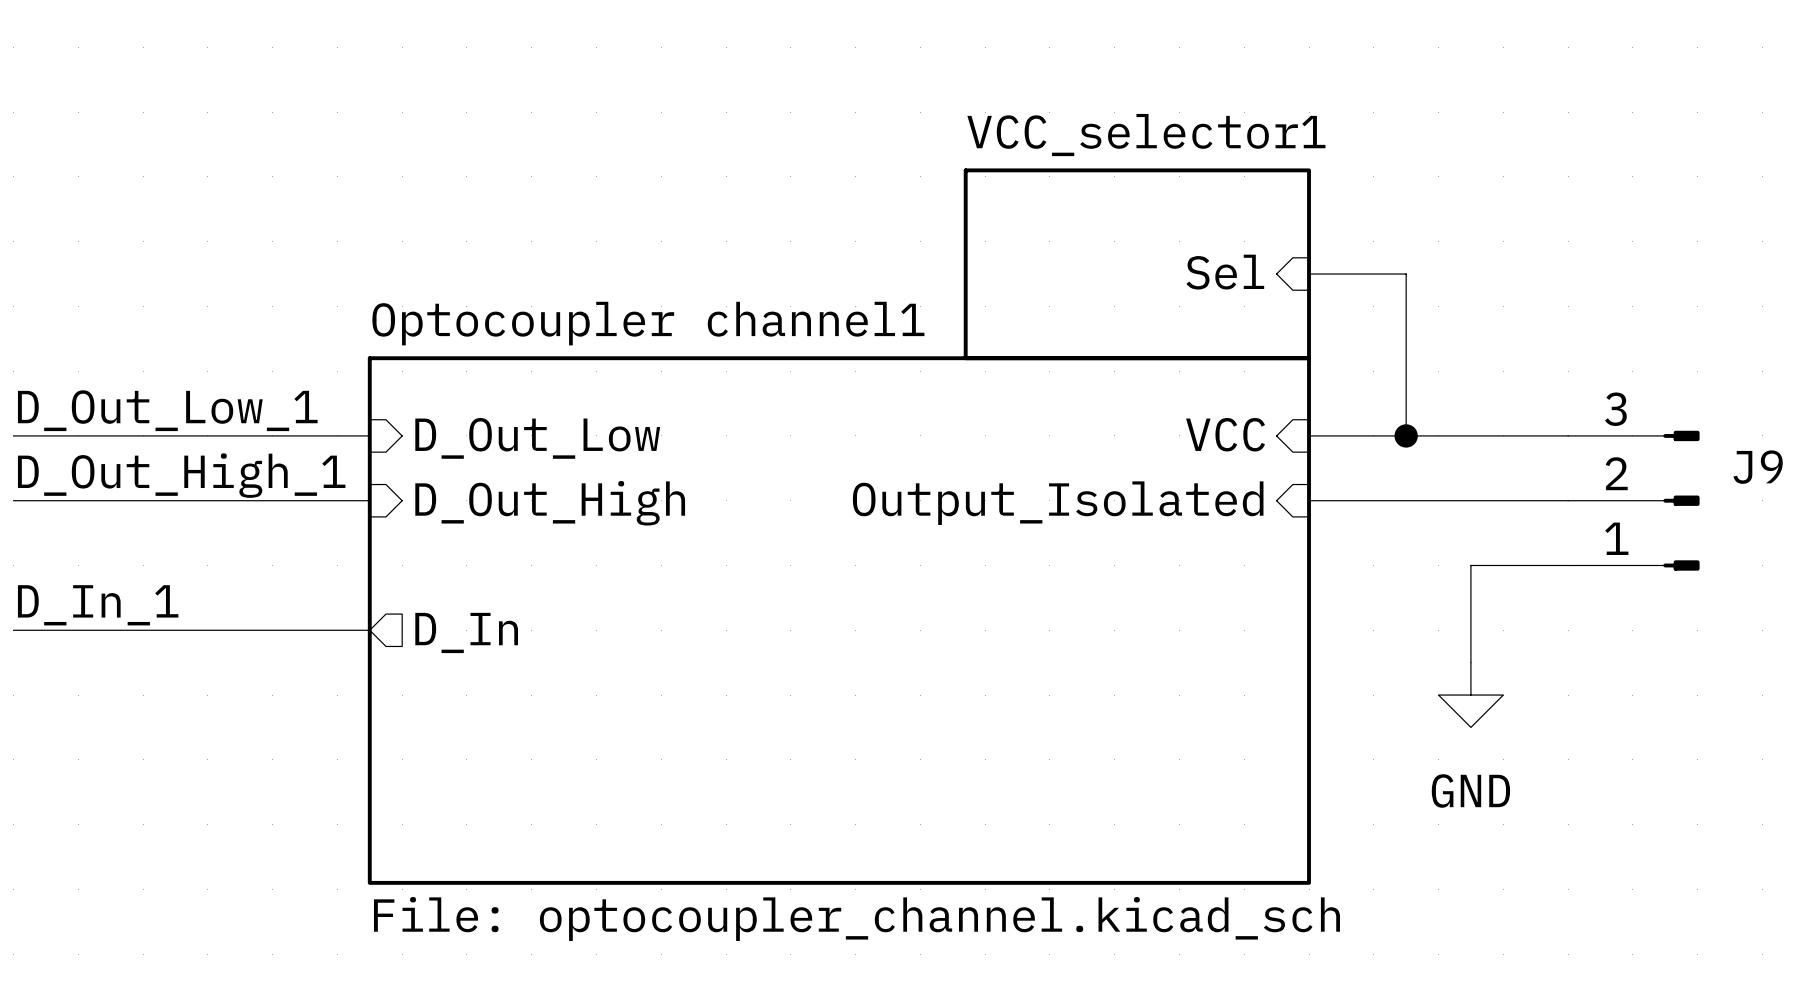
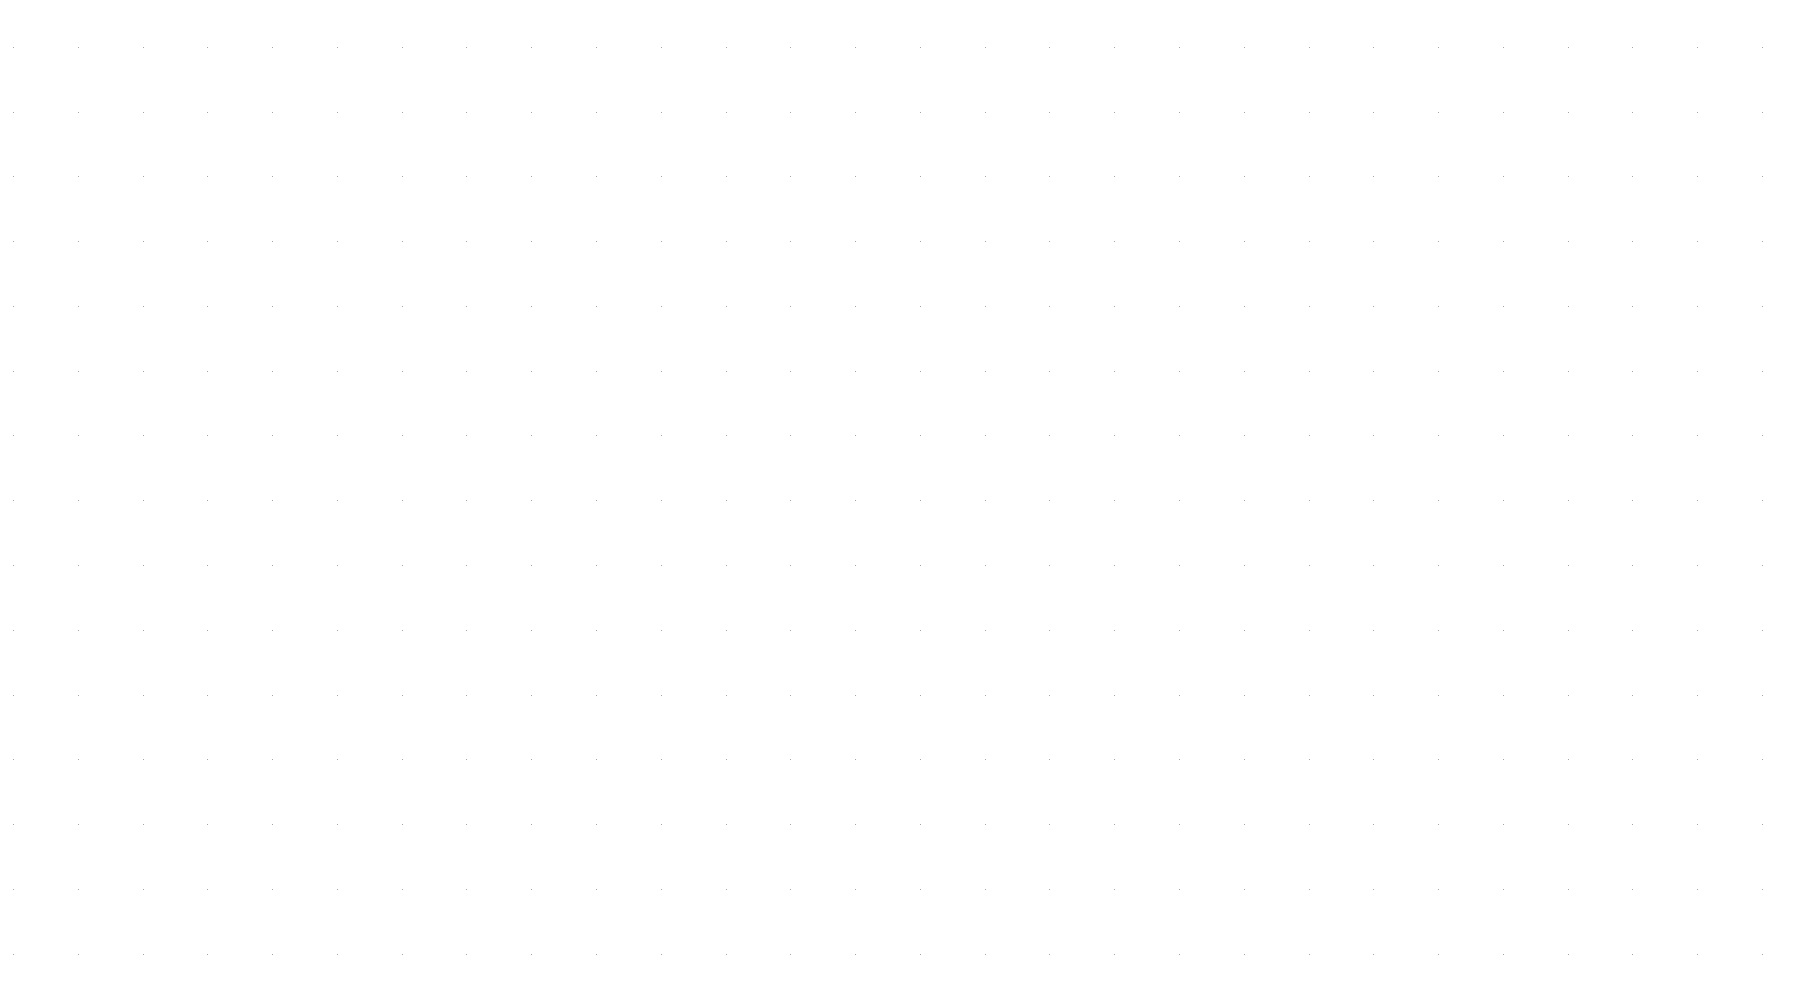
sheet VCC_selector1: (1137, 264) -> none
sheet pin: Sel (1225, 272) -> none
wire: (1309, 274) (1406, 274) (1406, 435) -> none
label: D_Out_Low_1 (167, 410) -> none
sheet pin: VCC (1225, 434) -> none
wire: (13, 435) (369, 435) -> none
wire: (1309, 435) (1568, 435) -> none
junction: (1406, 435) -> none
sheet pin: D_Out_Low (537, 438) -> none
label: D_Out_High_1 (181, 475) -> none
wire: (13, 500) (369, 500) -> none
wire: (1309, 500) (1568, 500) -> none
J9: (1633, 500) -> none
sheet pin: D_Out_High (550, 503) -> none
sheet pin: Output_Isolated (1058, 503) -> none
wire: (1568, 565) (1470, 565) (1470, 662) -> none
label: D_In_1 (98, 605) -> none
sheet Optocoupler channel1: File: optocoupler_channel.kicad_sch (839, 620) -> none
wire: (13, 630) (369, 630) -> none
sheet pin: D_In (466, 632) -> none
power symbol: GND (1470, 695) -> none

